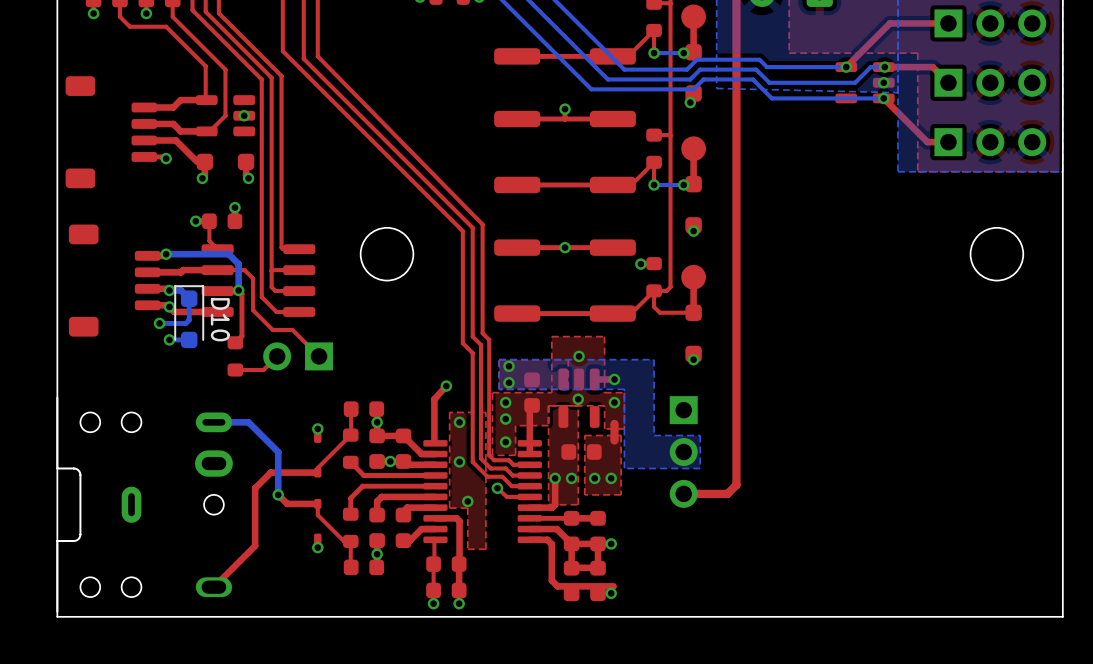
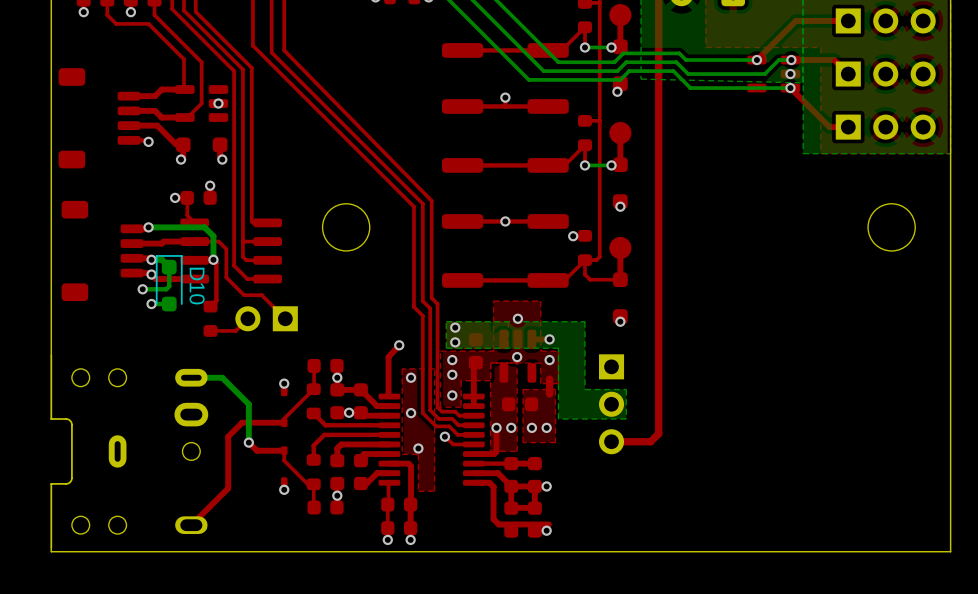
board edge: (57, 397) (57, 611) -> none

